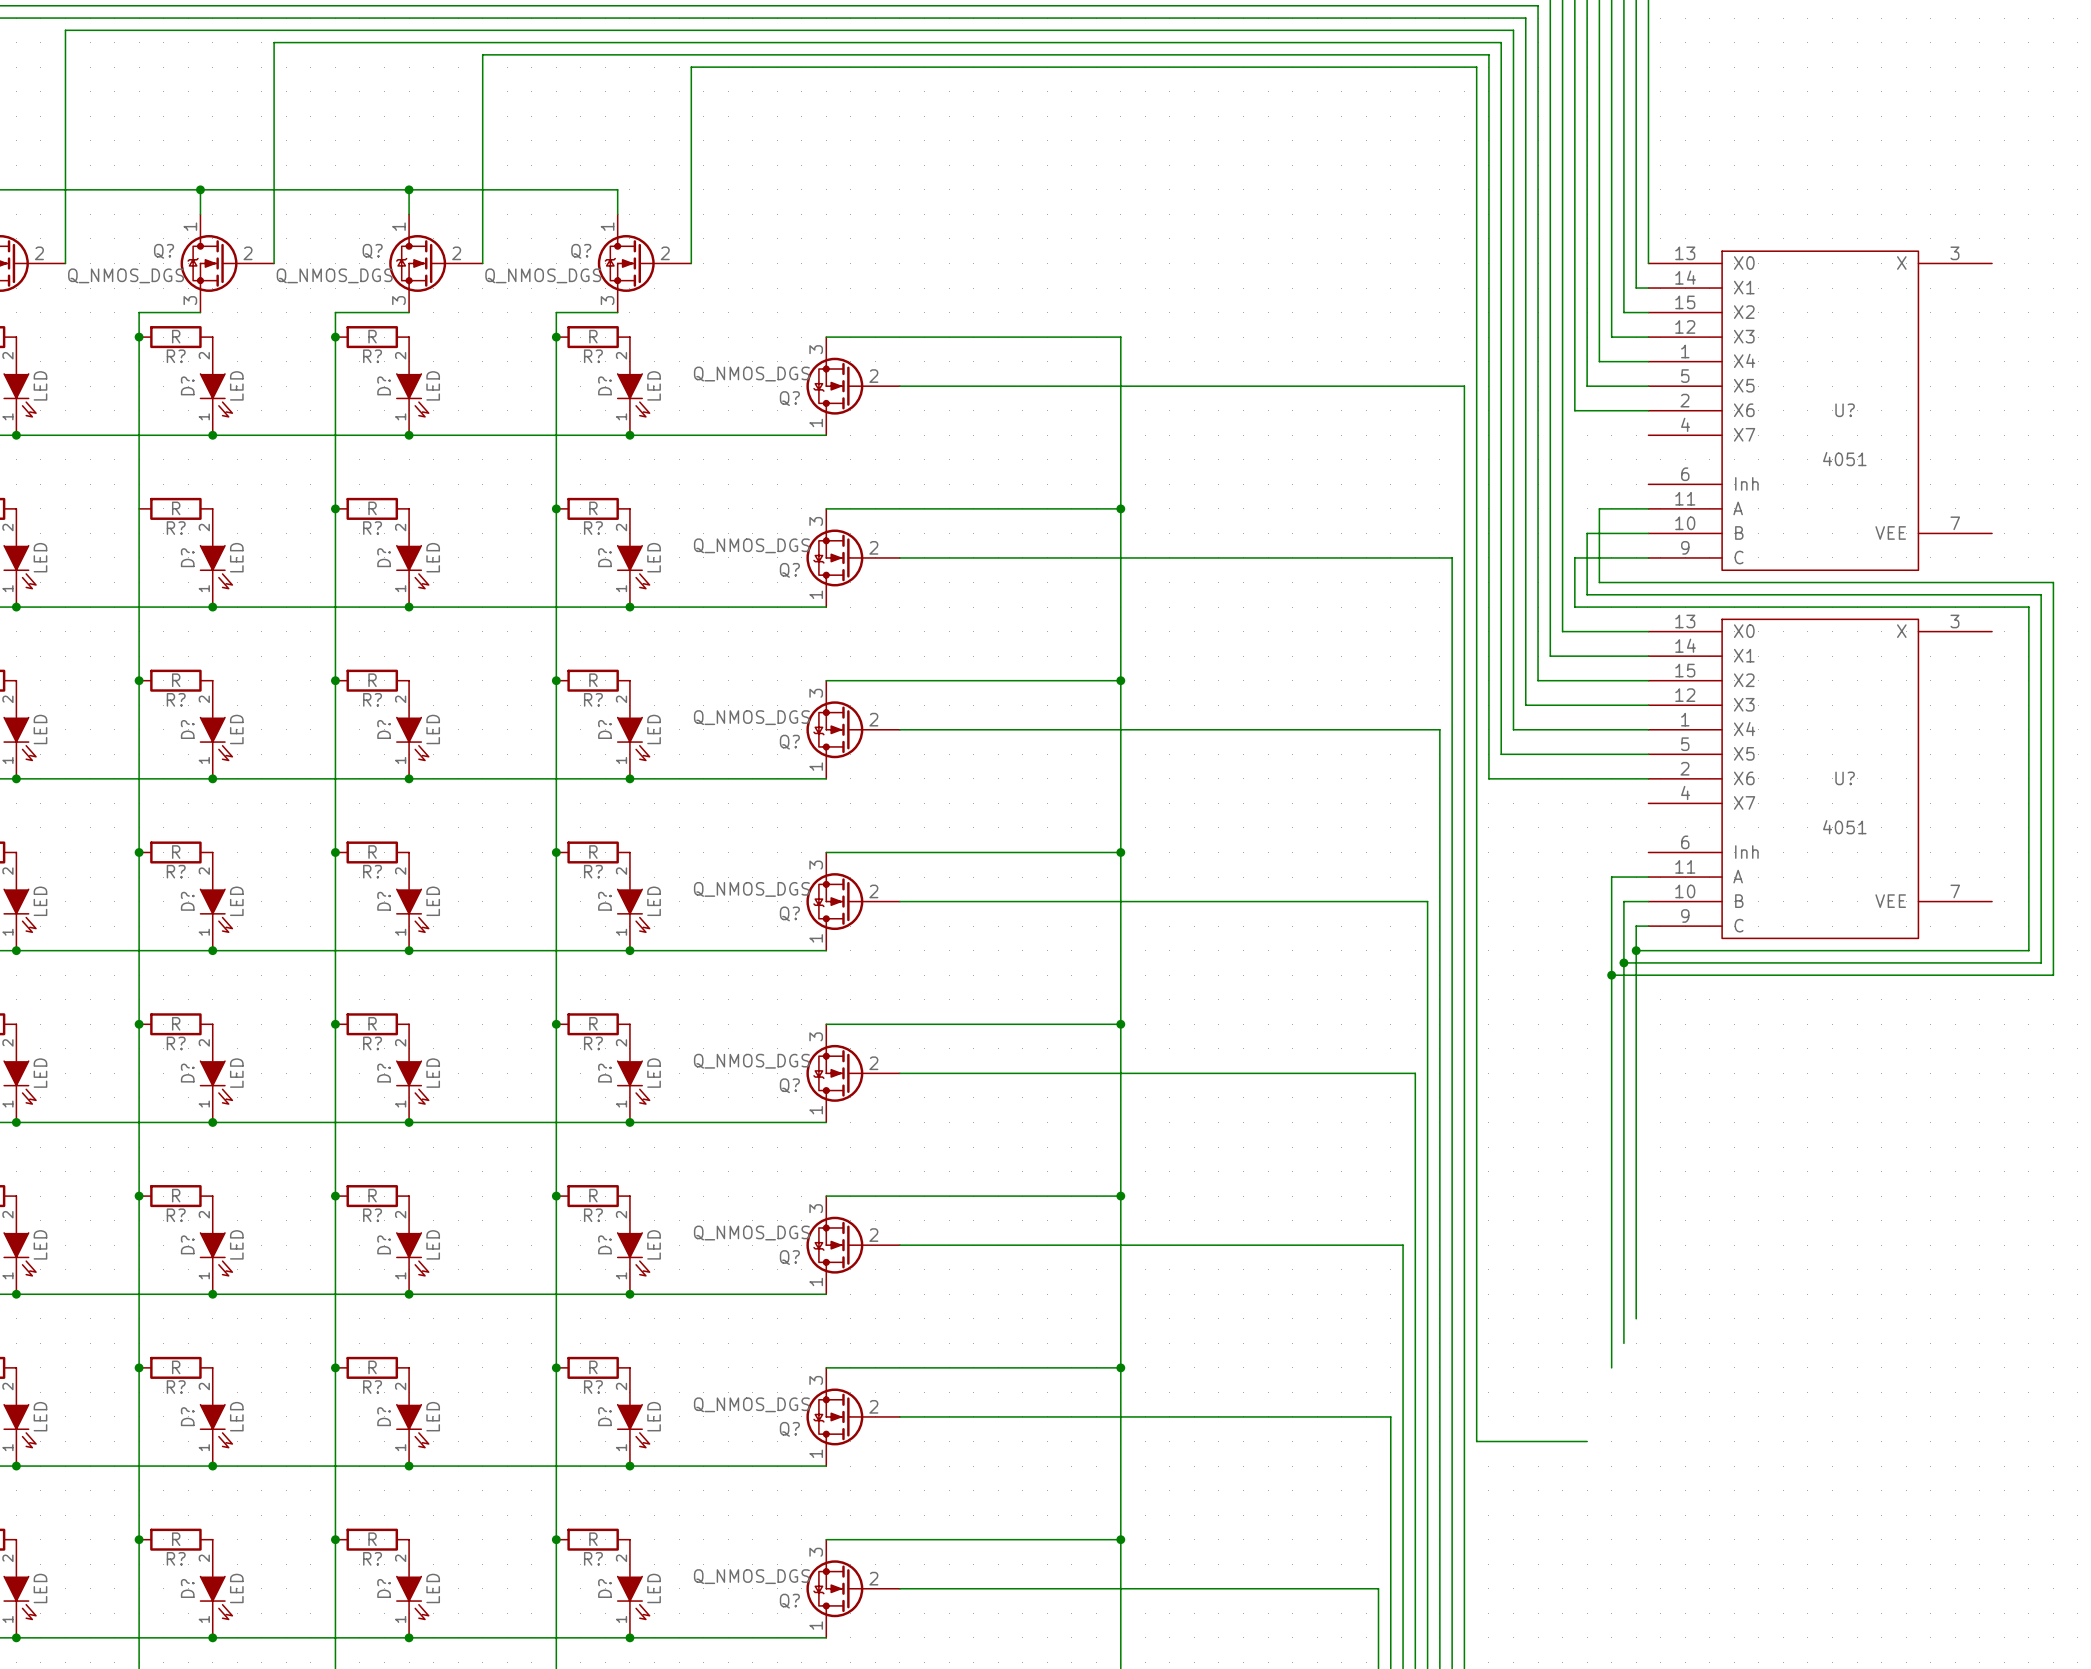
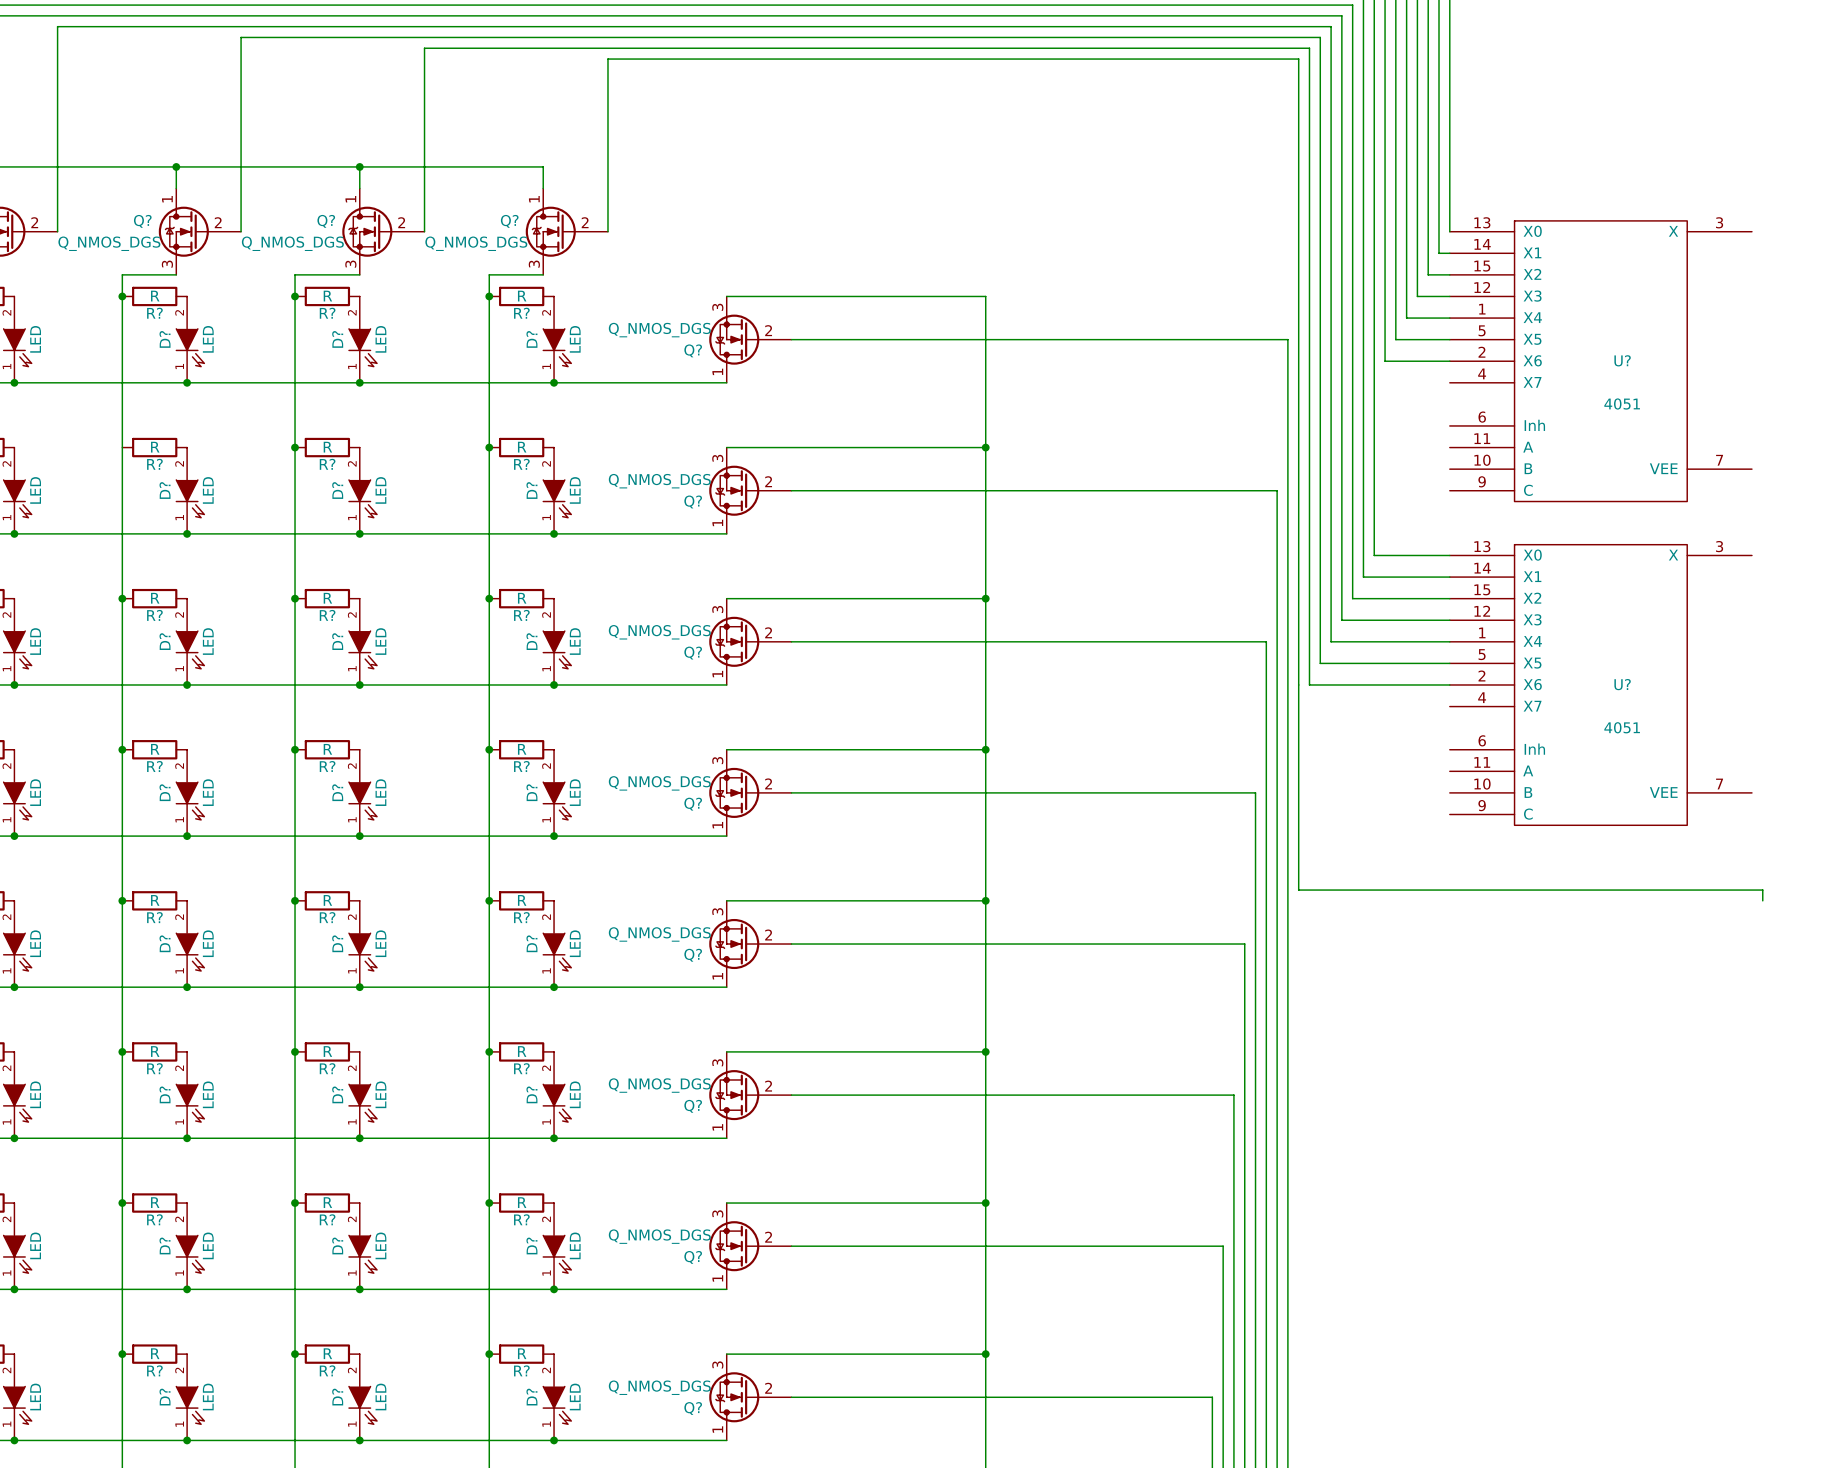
wire: (1648, 508) (1599, 508) (1599, 582) (2053, 582) (2053, 975) (1611, 975) -> none
wire: (1648, 533) (1587, 533) (1587, 594) (2041, 594) (2041, 962) (1623, 962) -> none
wire: (1648, 557) (1574, 557) (1574, 607) (2028, 607) (2028, 950) (1636, 950) -> none
wire: (1648, 877) (1611, 877) (1611, 1367) -> none
wire: (1648, 901) (1623, 901) (1623, 1343) -> none
wire: (1648, 926) (1636, 926) (1636, 1318) -> none
junction: (1636, 950) -> none
junction: (1623, 962) -> none
junction: (1611, 975) -> none
wire: (1476, 1012) (1476, 1441) (1587, 1441) -> (1298, 890) (1762, 890) (1762, 900)

